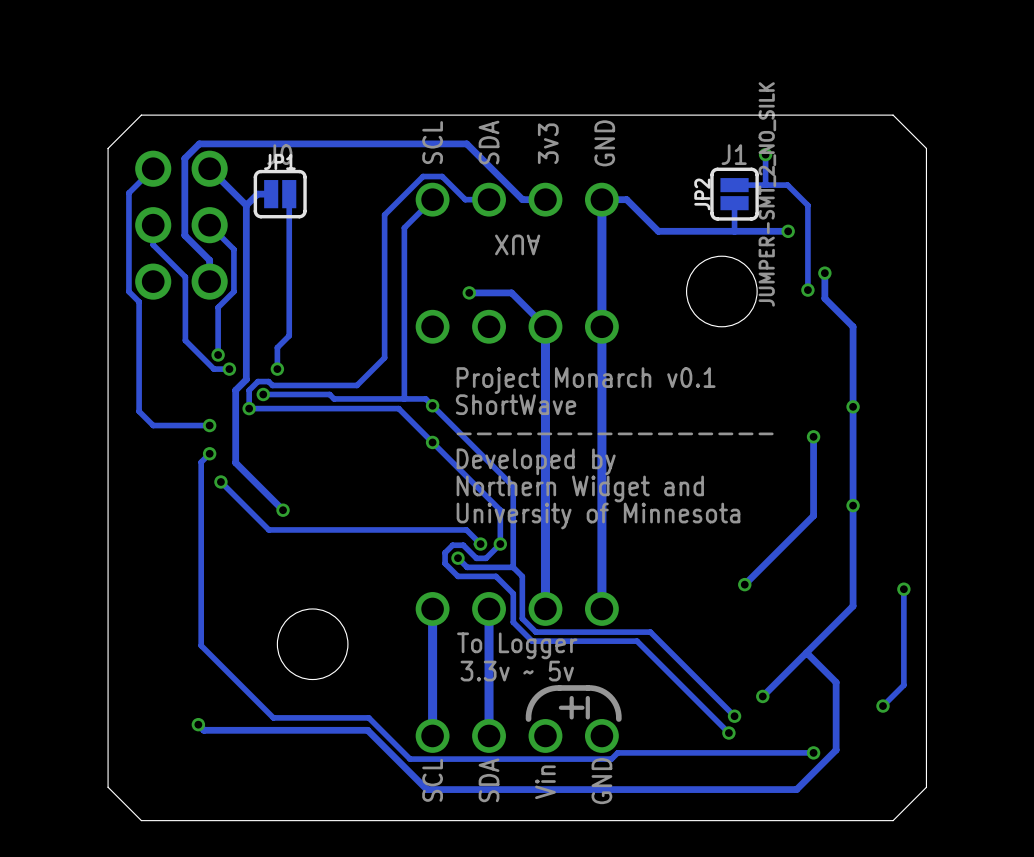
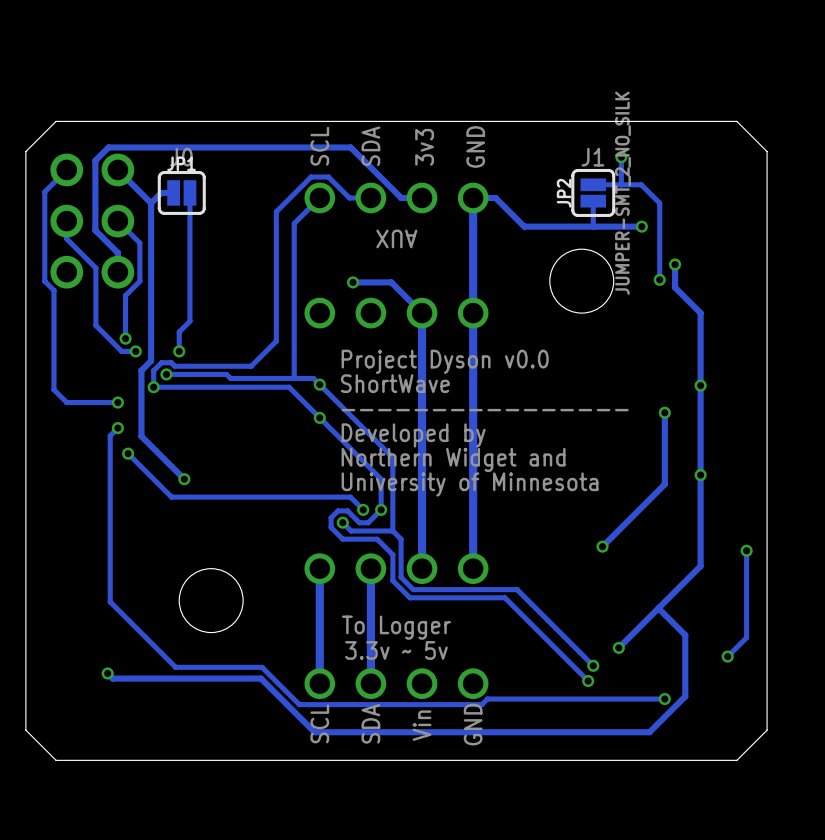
text: Project Monarch v0.1 (586, 380) -> Project Dyson v0.0 (445, 361)
text: To Logger (517, 645) -> none
text: 3.3v ~ 5v (517, 671) -> To Logger (396, 627)
text: none -> 3.3v ~ 5v (396, 650)
text: ± (574, 707) -> none
line: (618, 719) (616, 705) (610, 696) (601, 690) (587, 687) (556, 688) (545, 690) (532, 702) (528, 719) -> none

